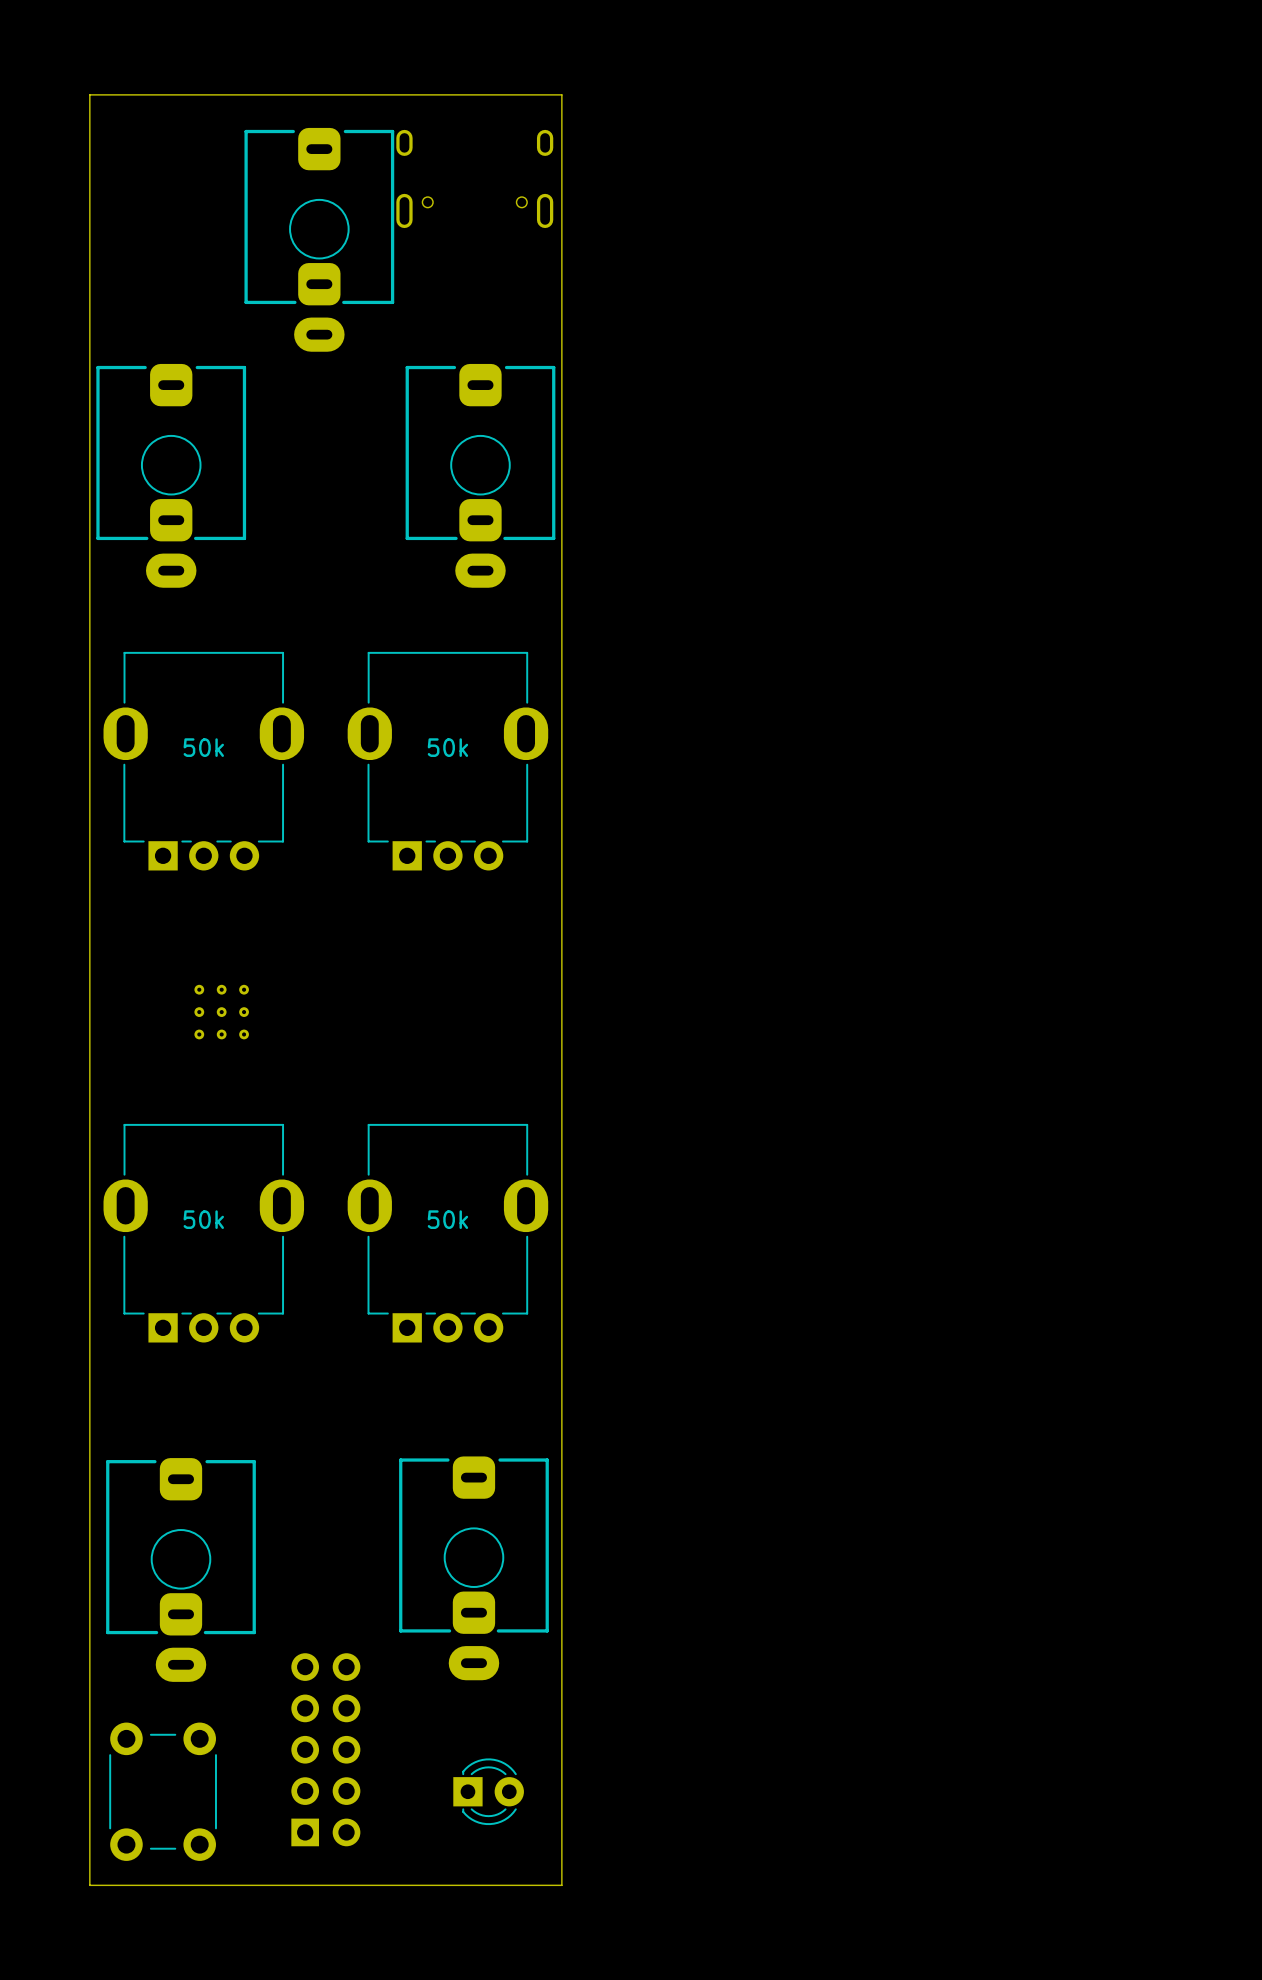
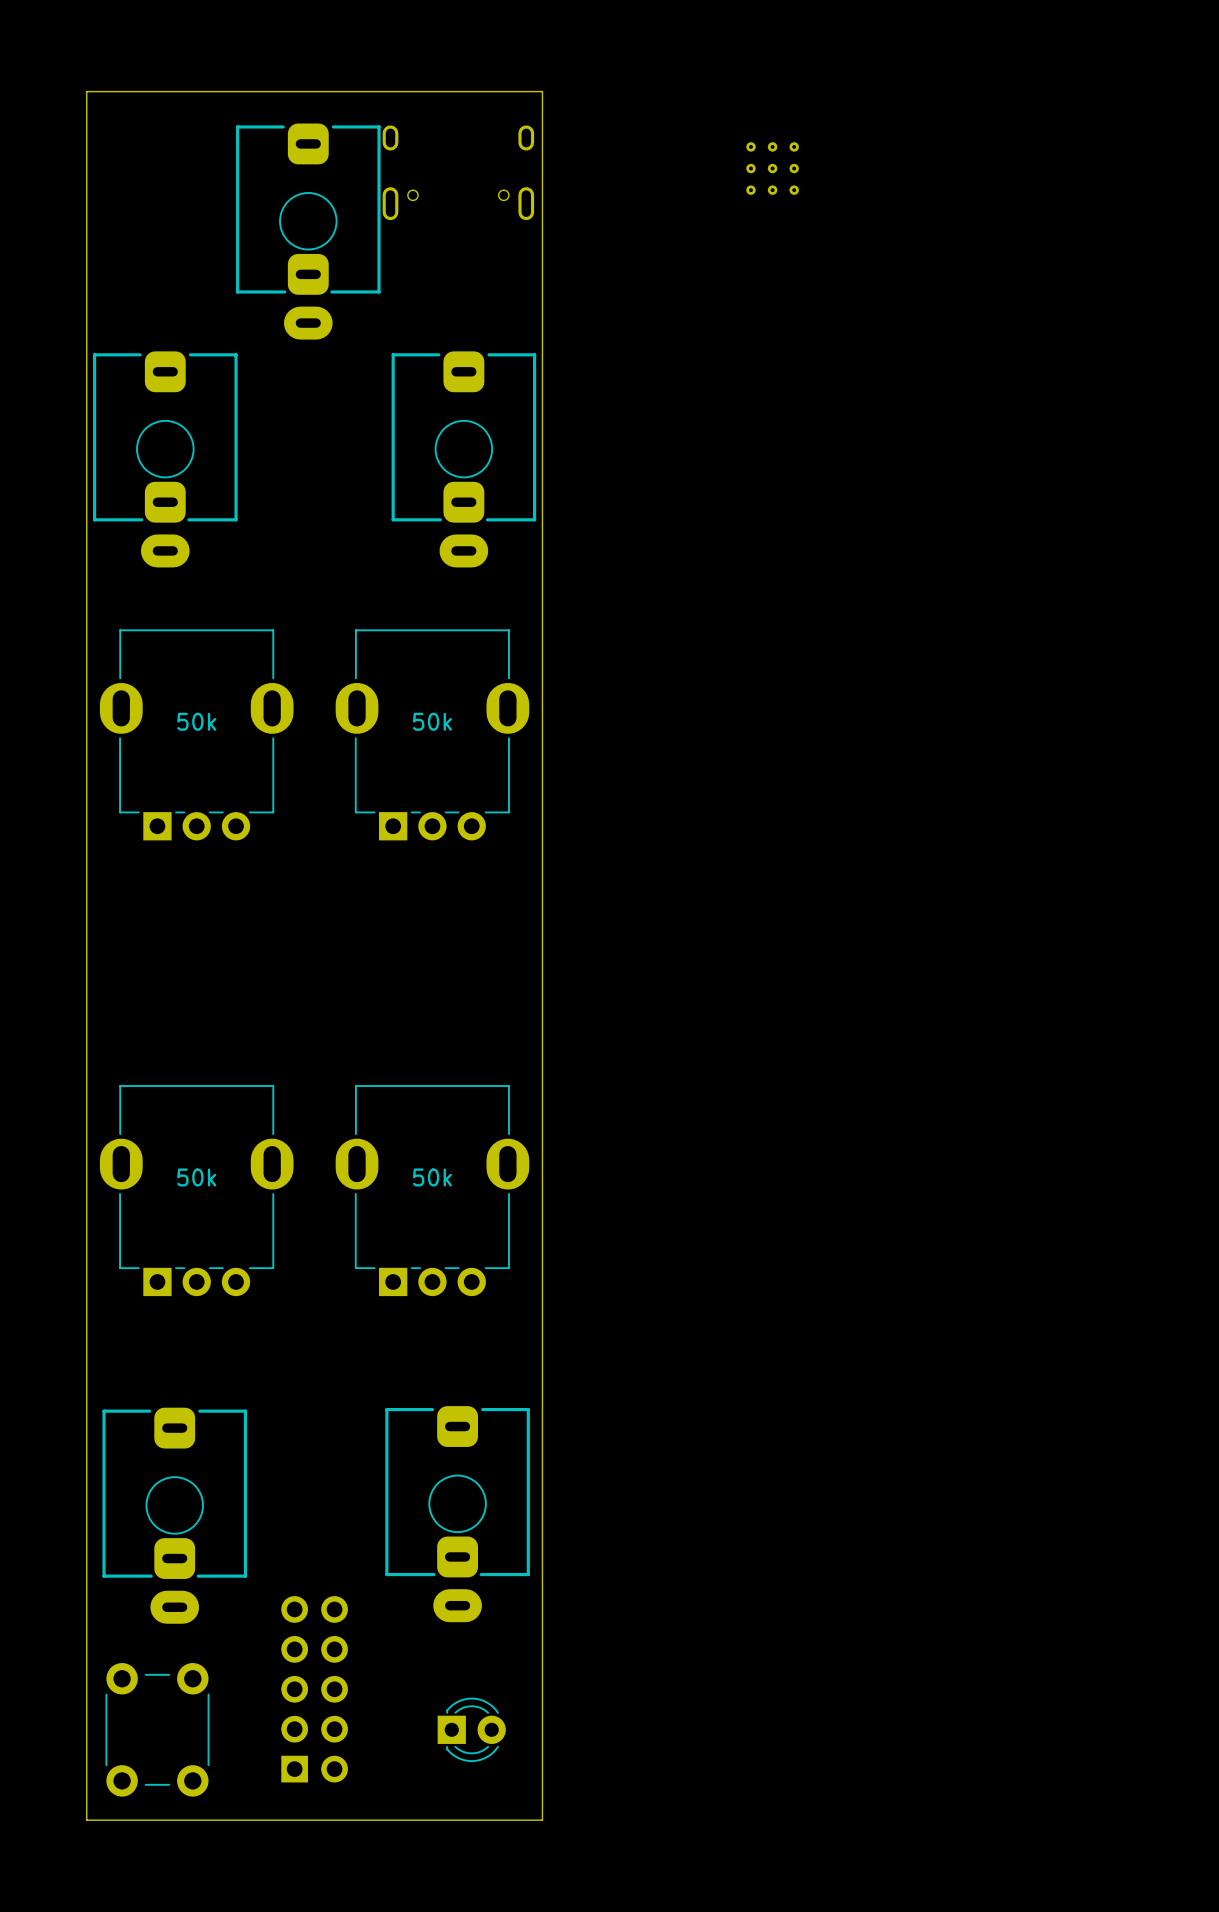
part: none -> (772, 168)
part: (221, 1012) -> none

